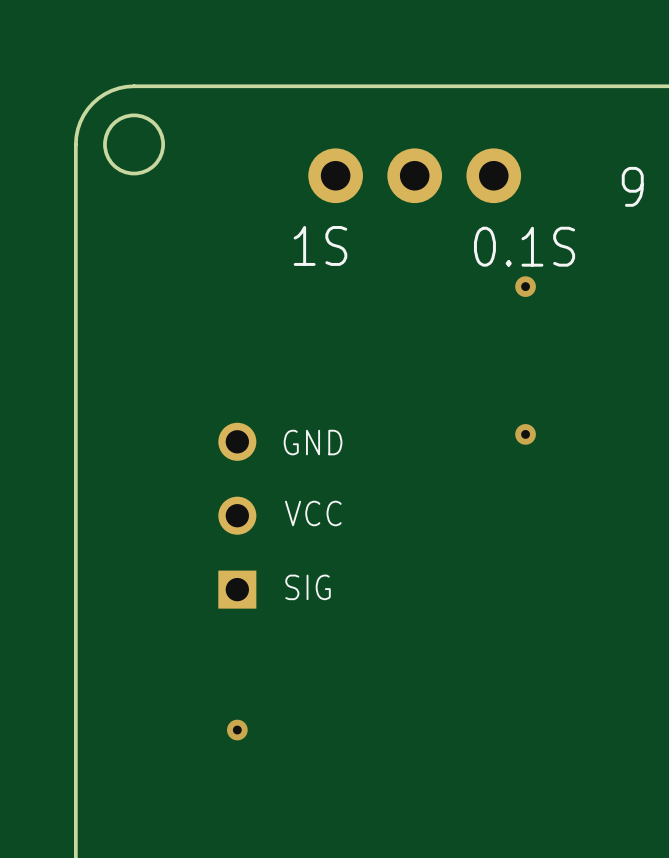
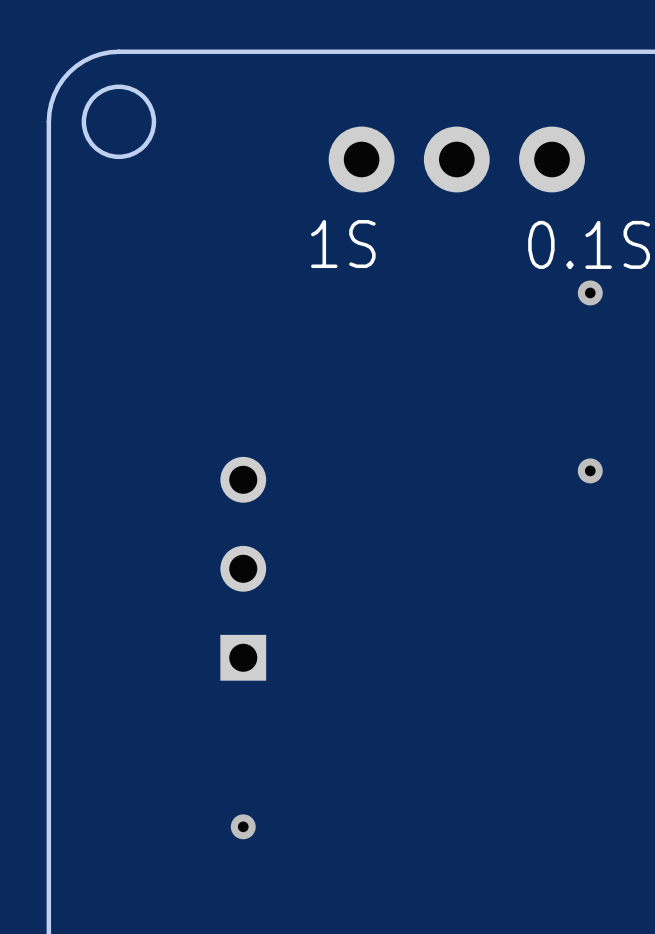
text: GND (313, 442) -> none
text: VCC (313, 513) -> none
text: SIG (308, 587) -> none

